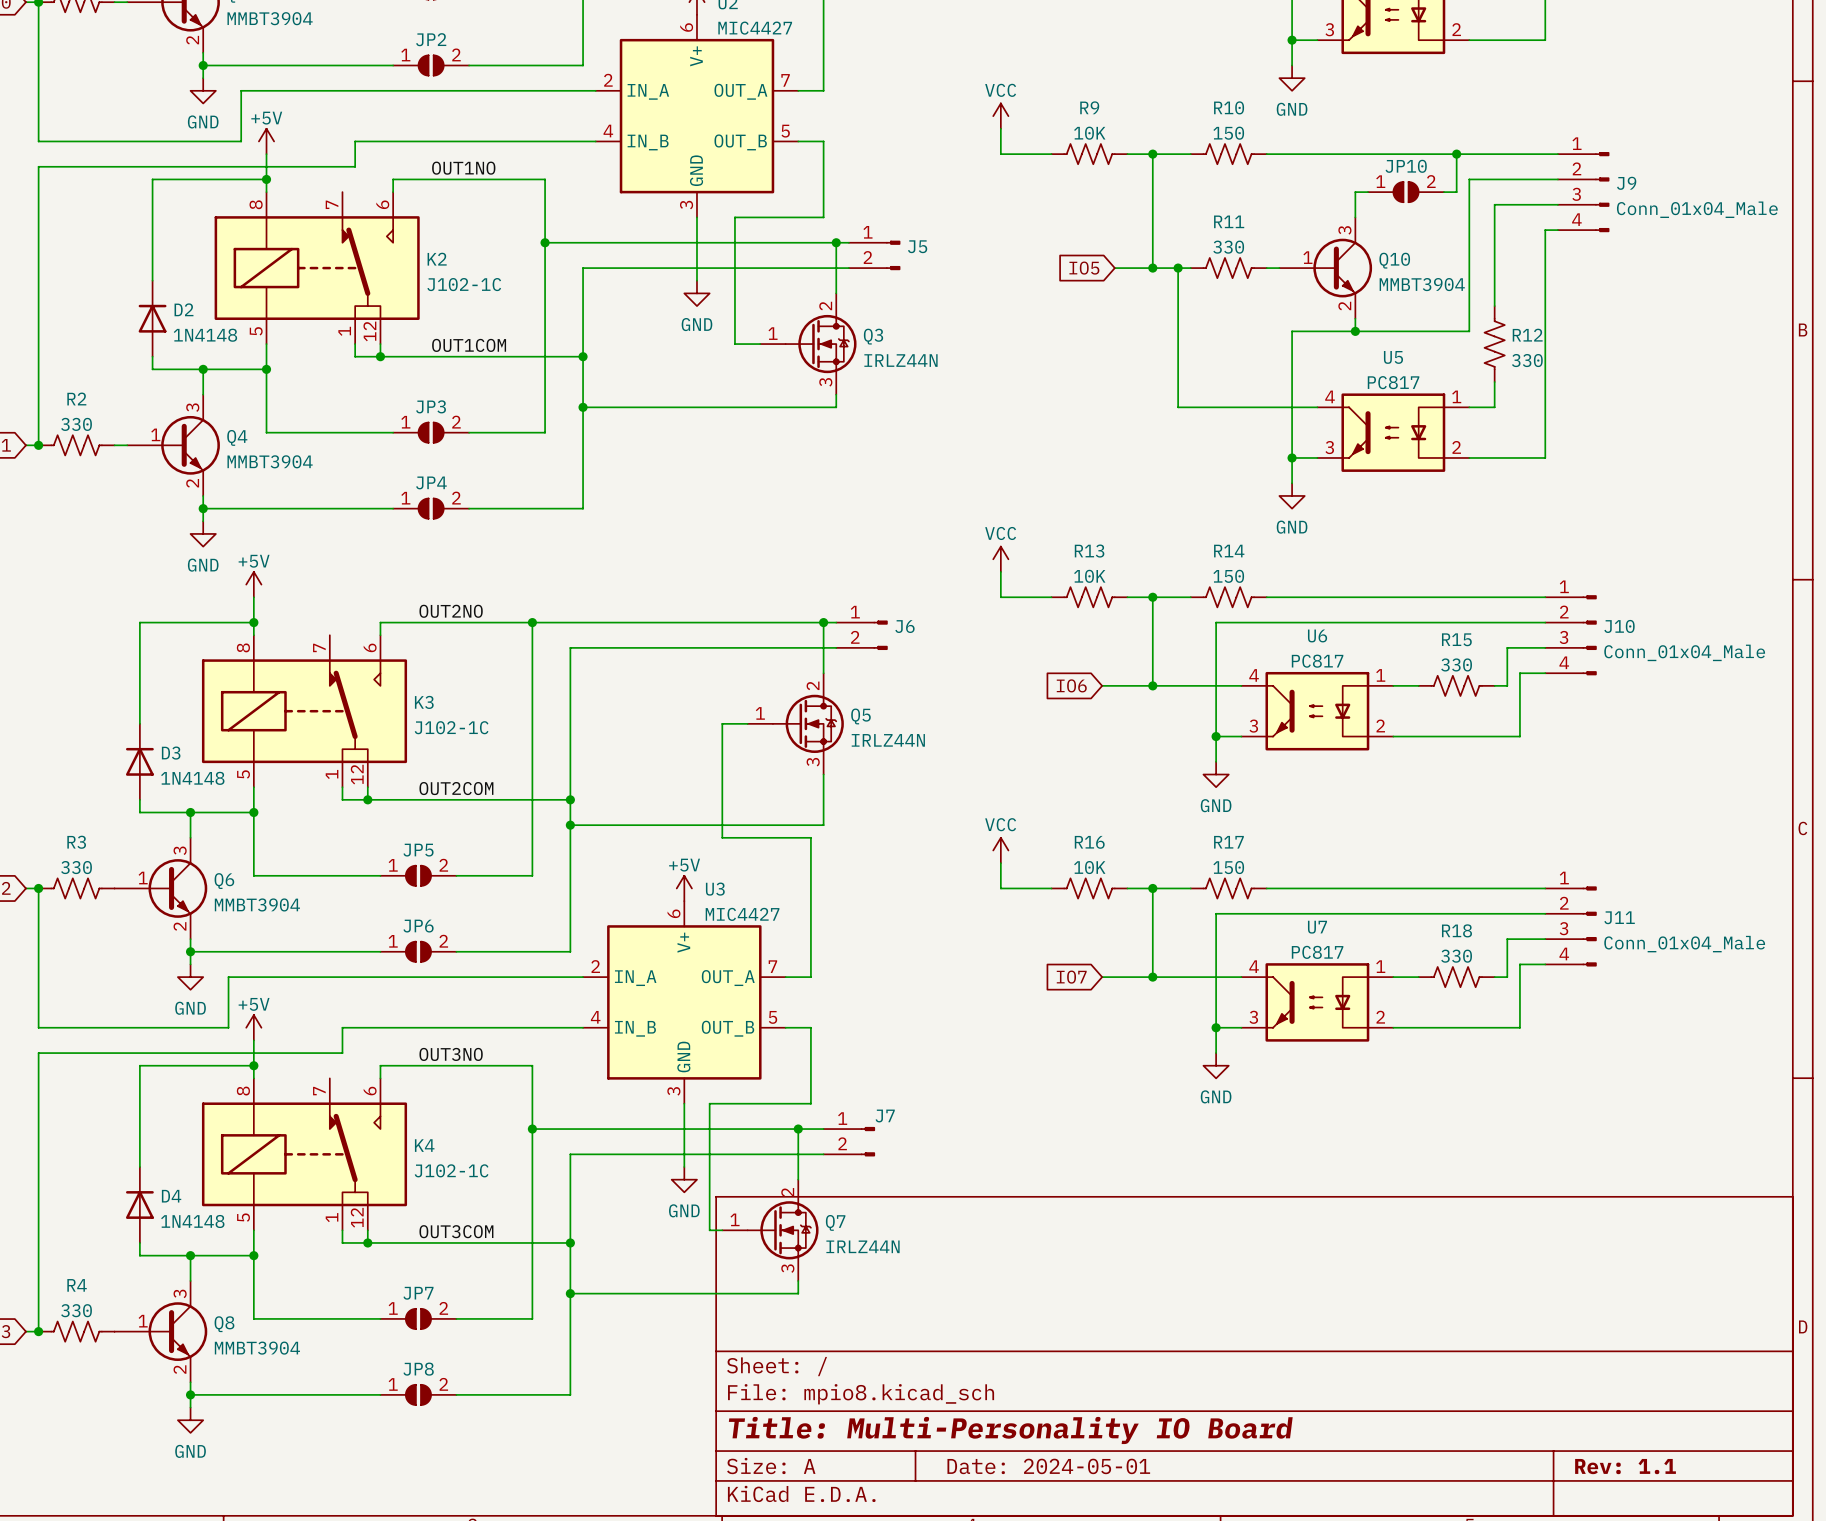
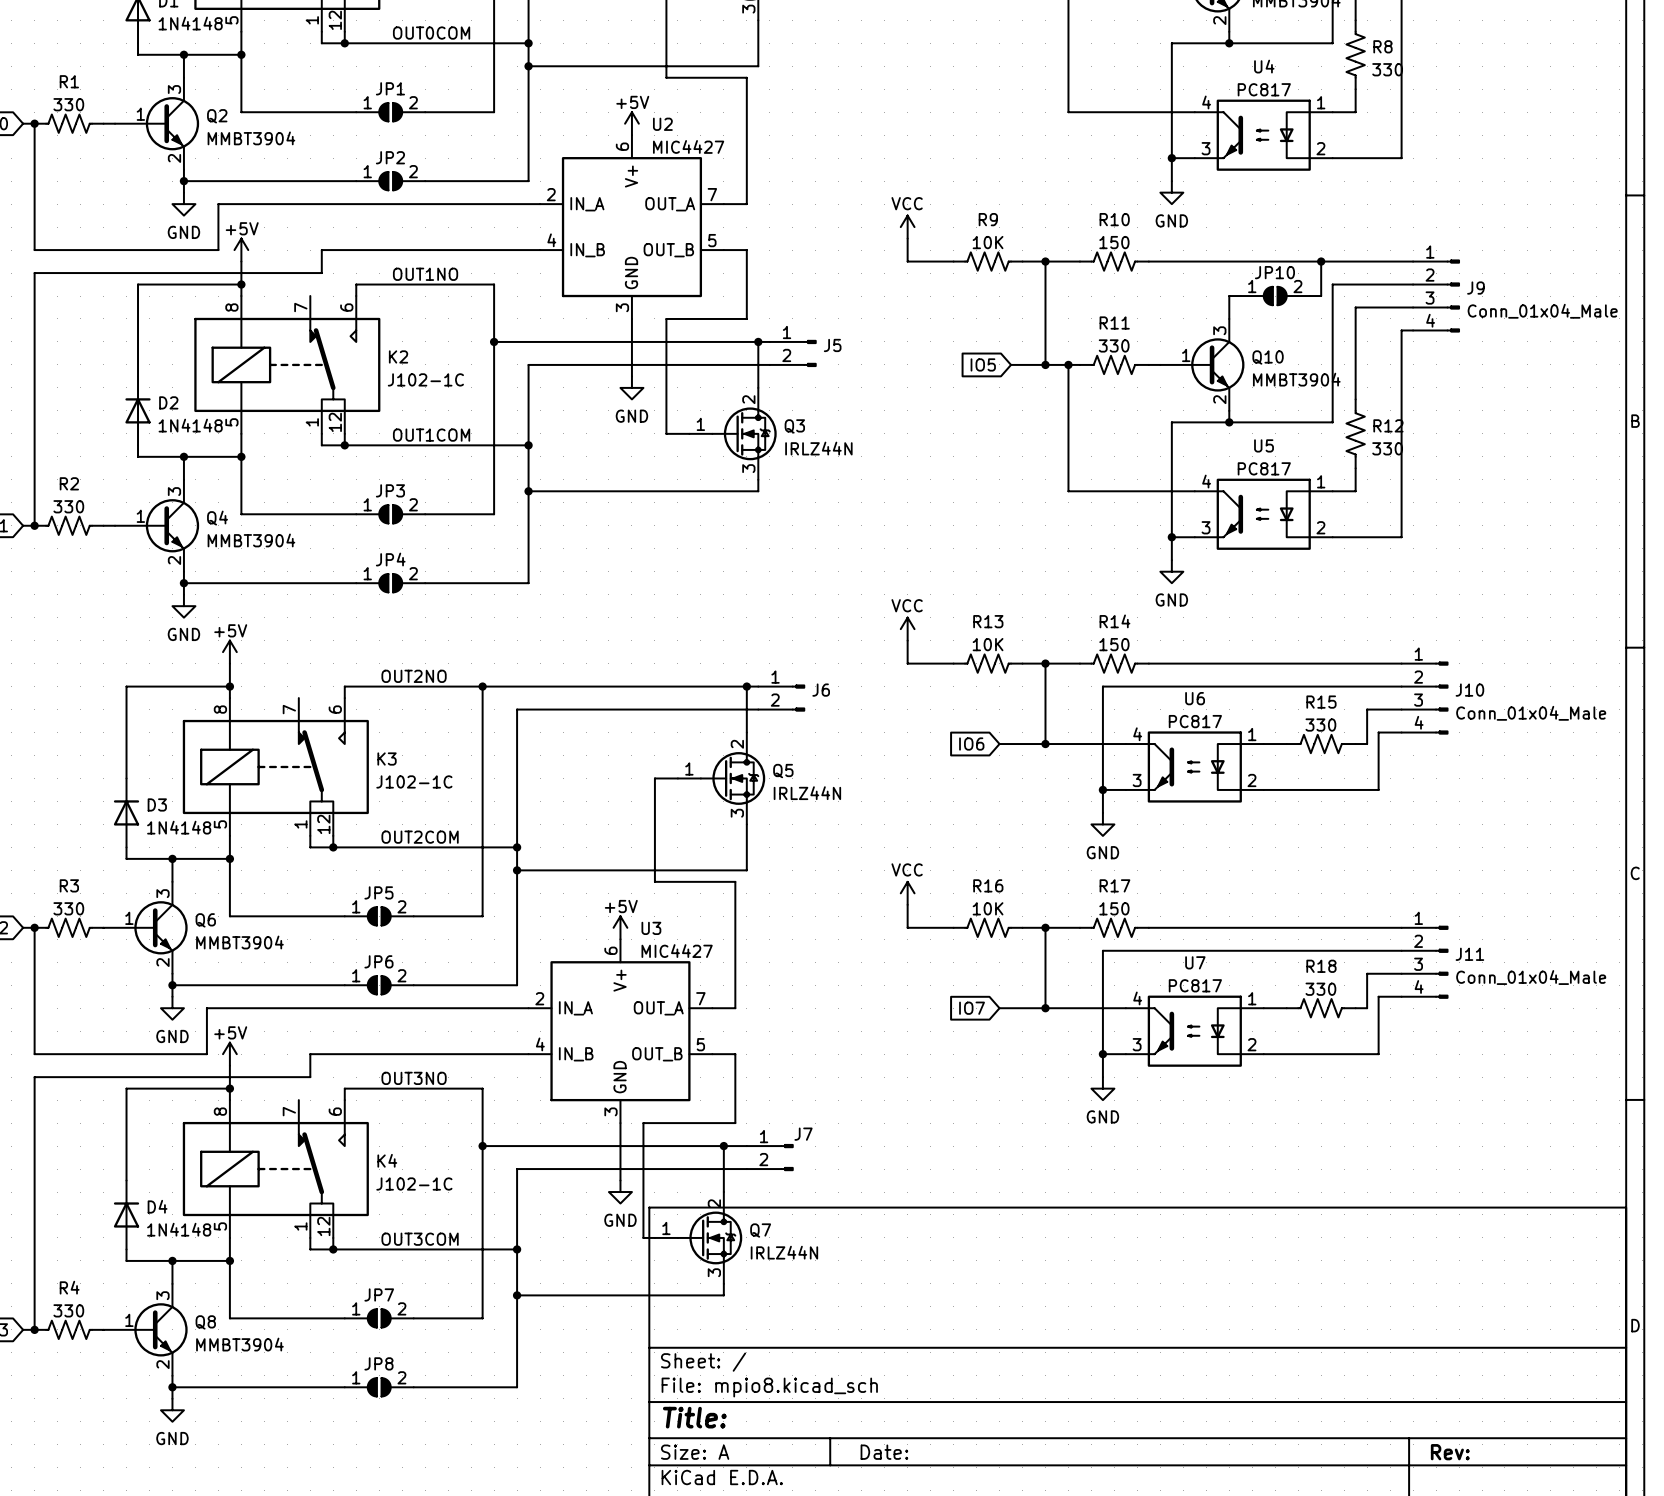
title block: Title: Multi-Personality IO Board (1010, 1430) -> Title: (694, 1417)
title block: Date: 2024-05-01 (1048, 1466) -> Date: (884, 1452)
title block: Rev: 1.1 (1625, 1466) -> Rev: (1450, 1452)

